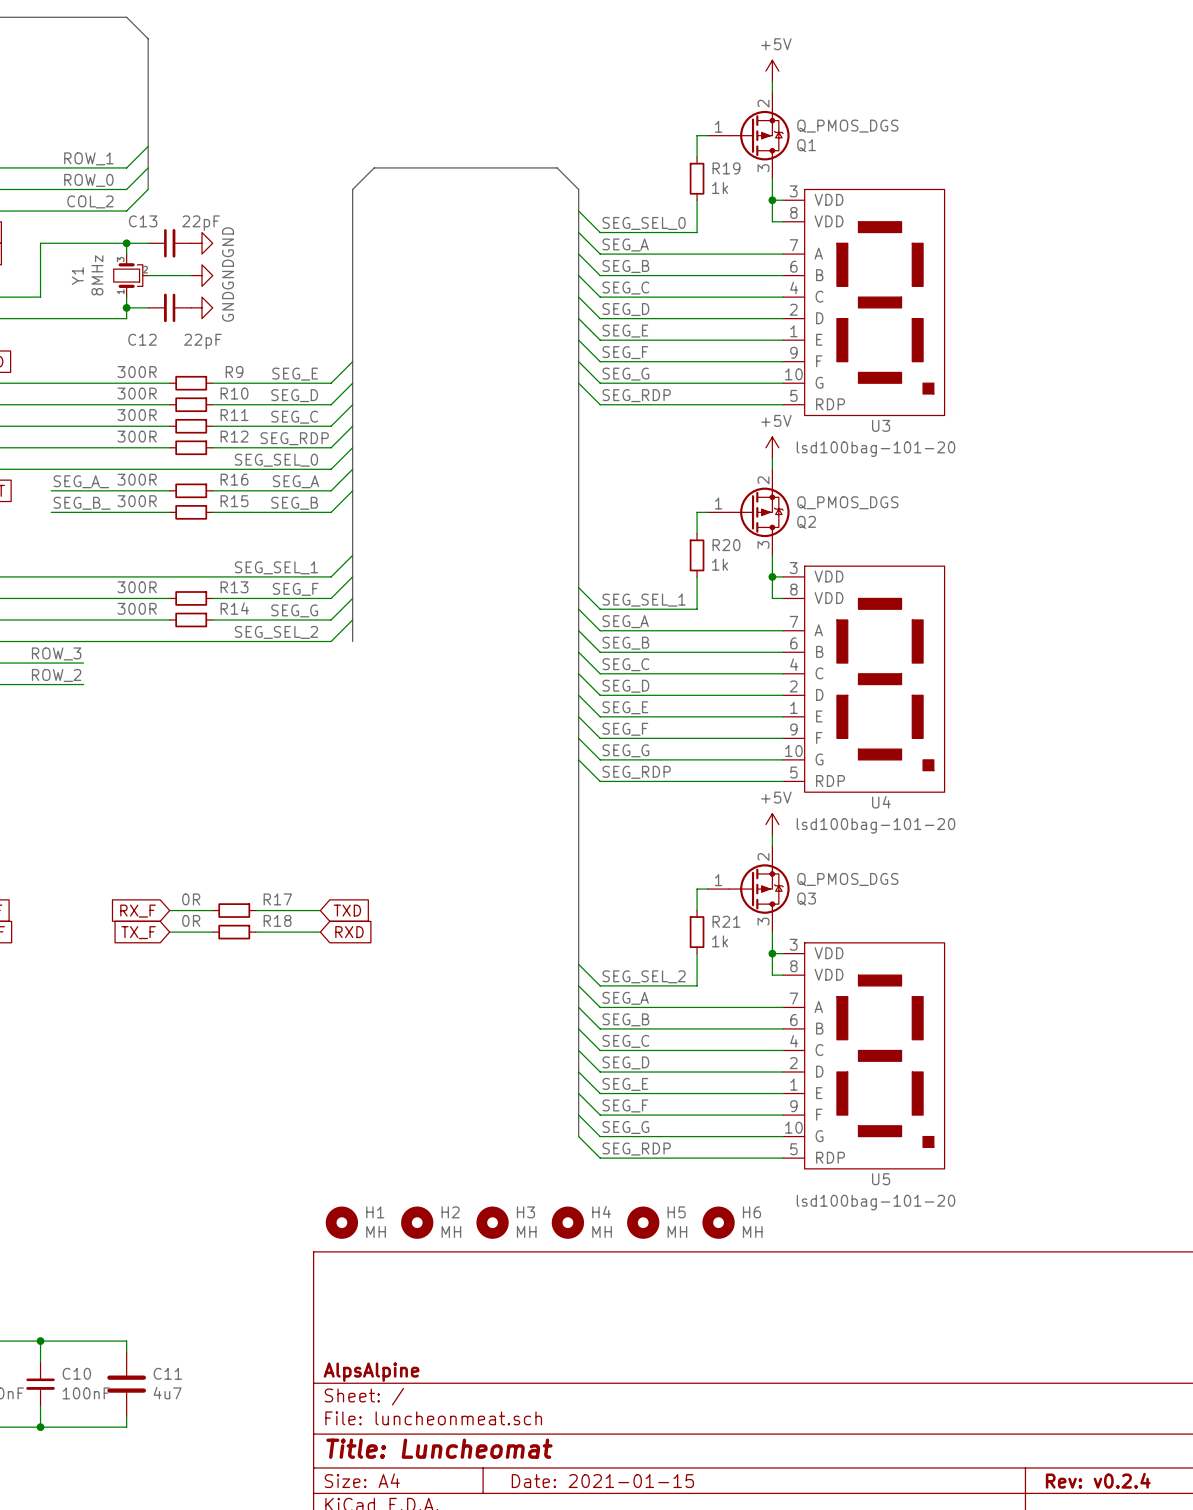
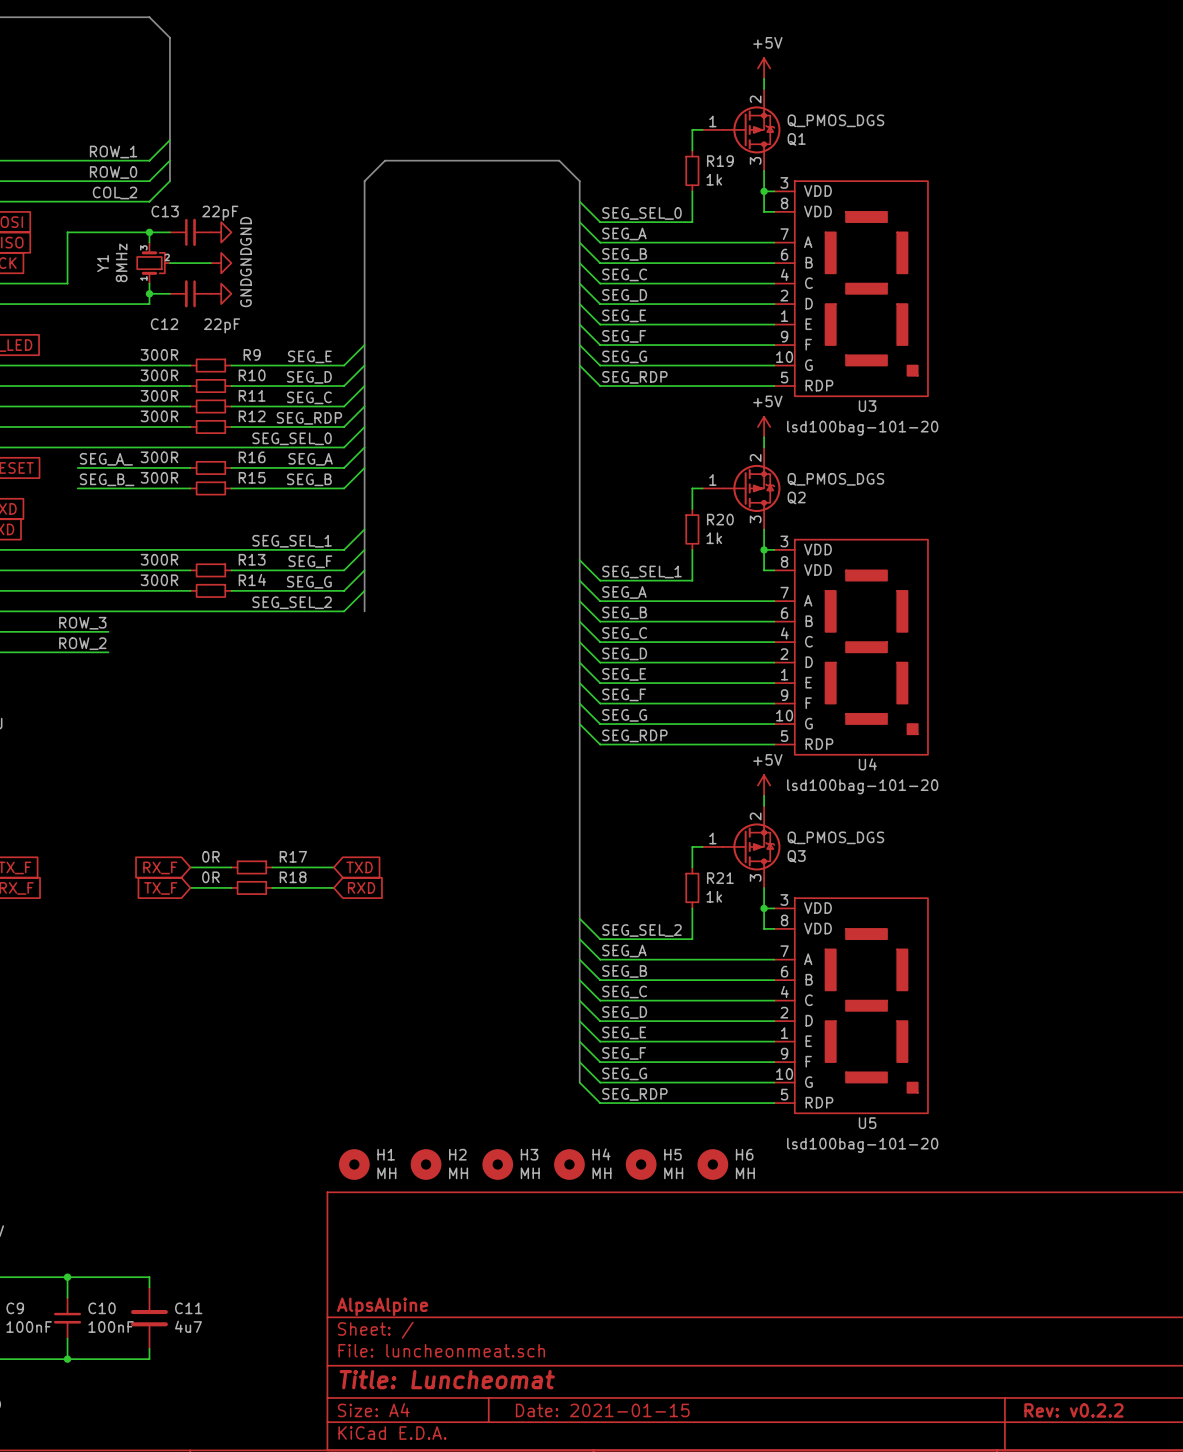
title block: Rev: v0.2.4 (1098, 1480) -> Rev: v0.2.2 (1073, 1410)

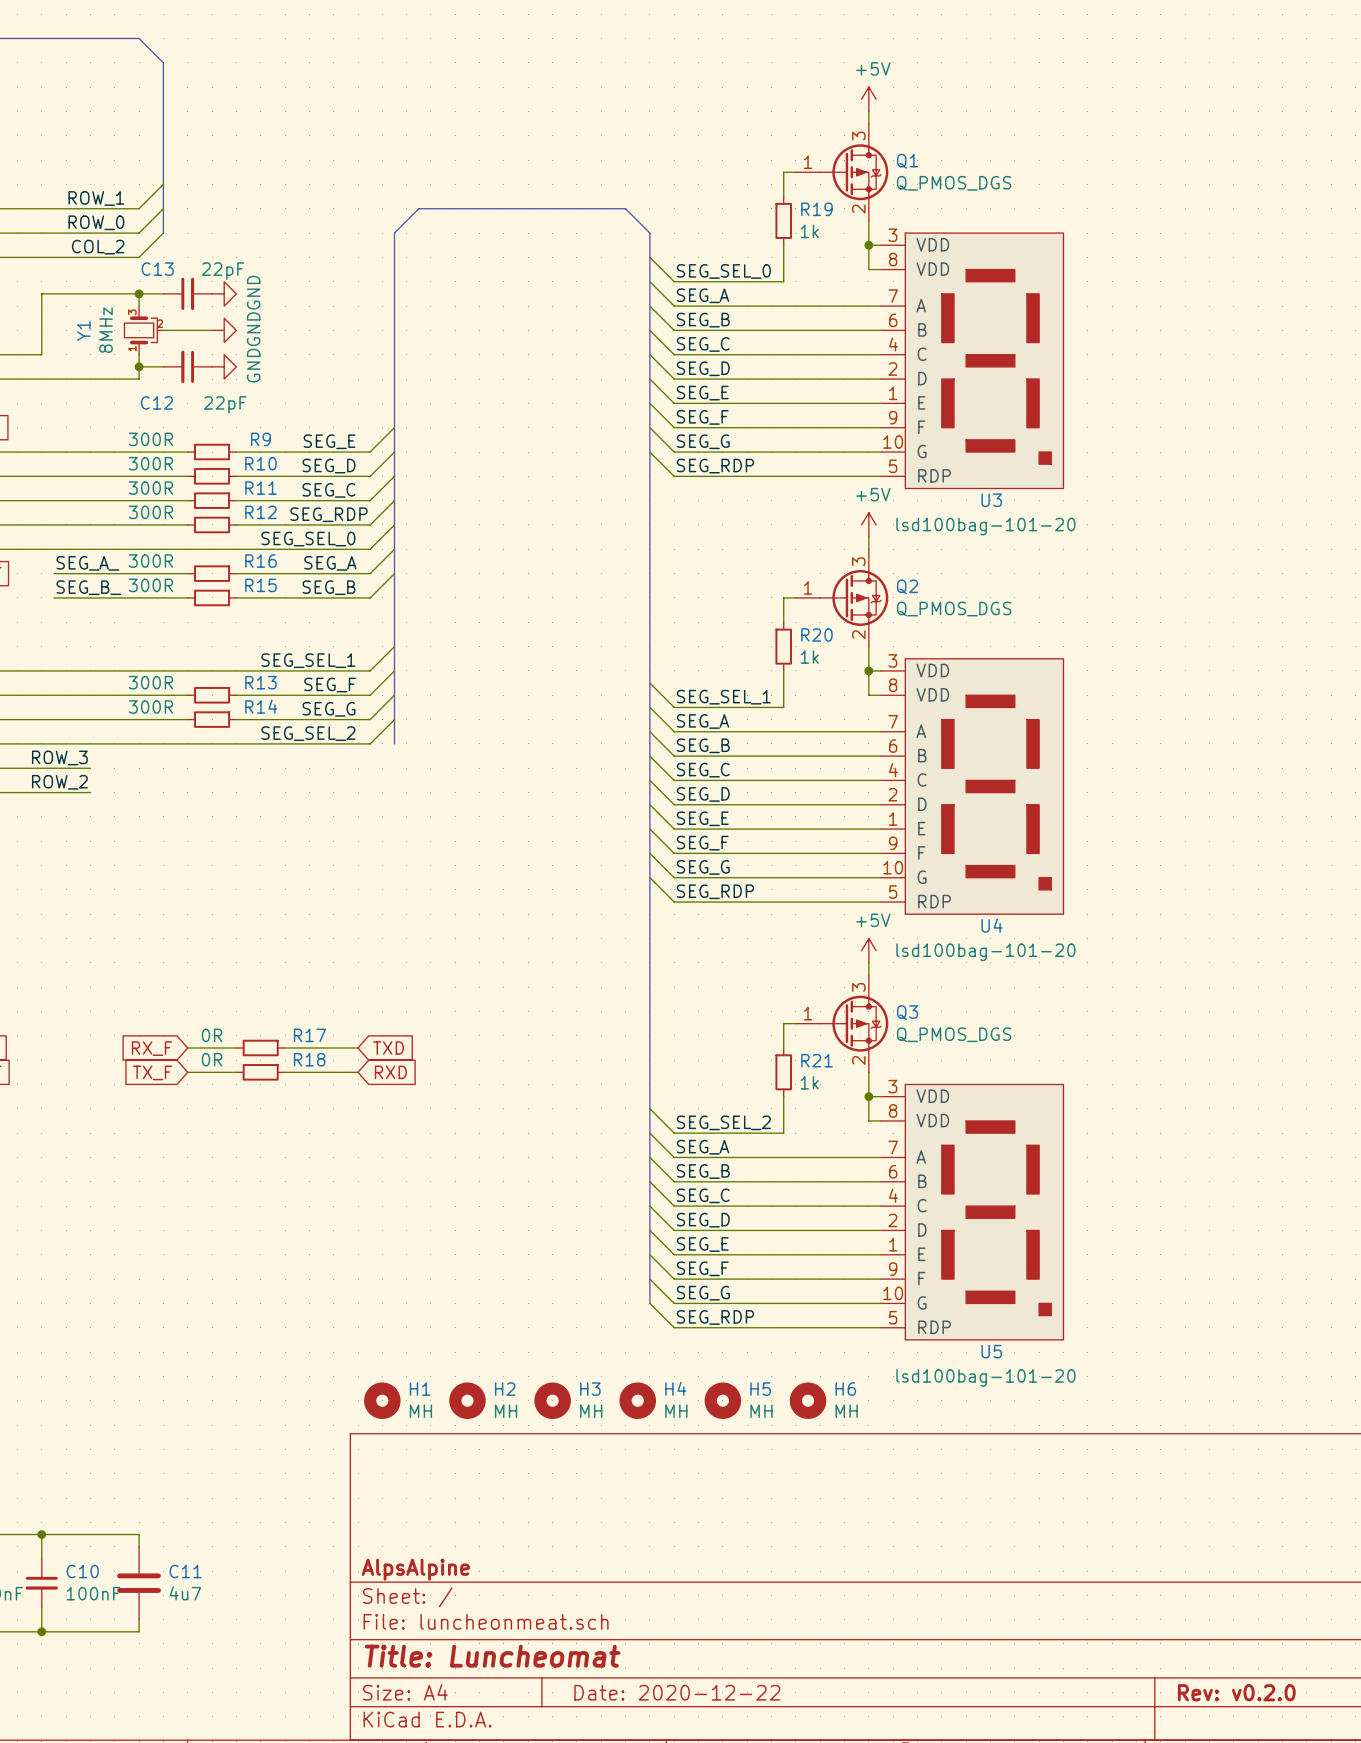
Q1 flip: as is (751, 129) -> up-down (854, 172)
Q2 flip: as is (751, 488) -> up-down (854, 597)
Q3 flip: as is (751, 846) -> up-down (854, 1023)
title block: Date: 2021-01-15 (602, 1410) -> Date: 2020-12-22 (677, 1692)
title block: Rev: v0.2.2 (1073, 1410) -> Rev: v0.2.0 (1236, 1692)

